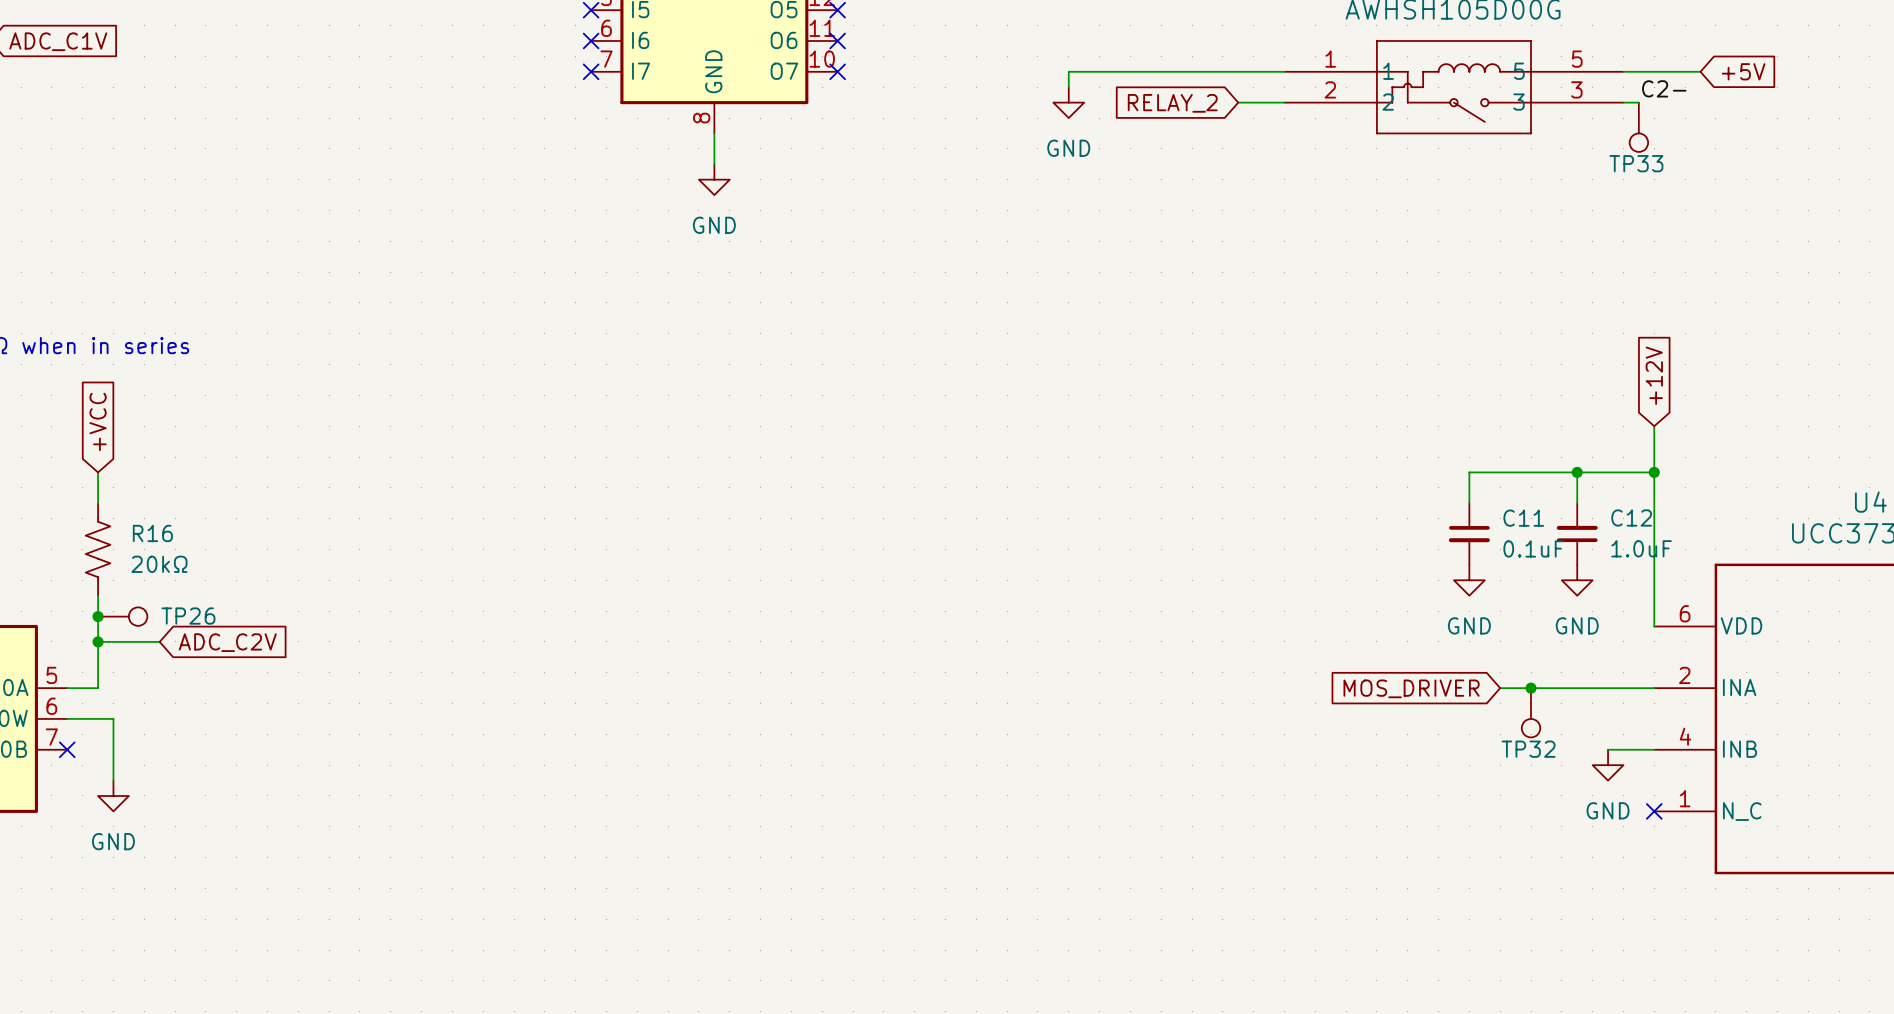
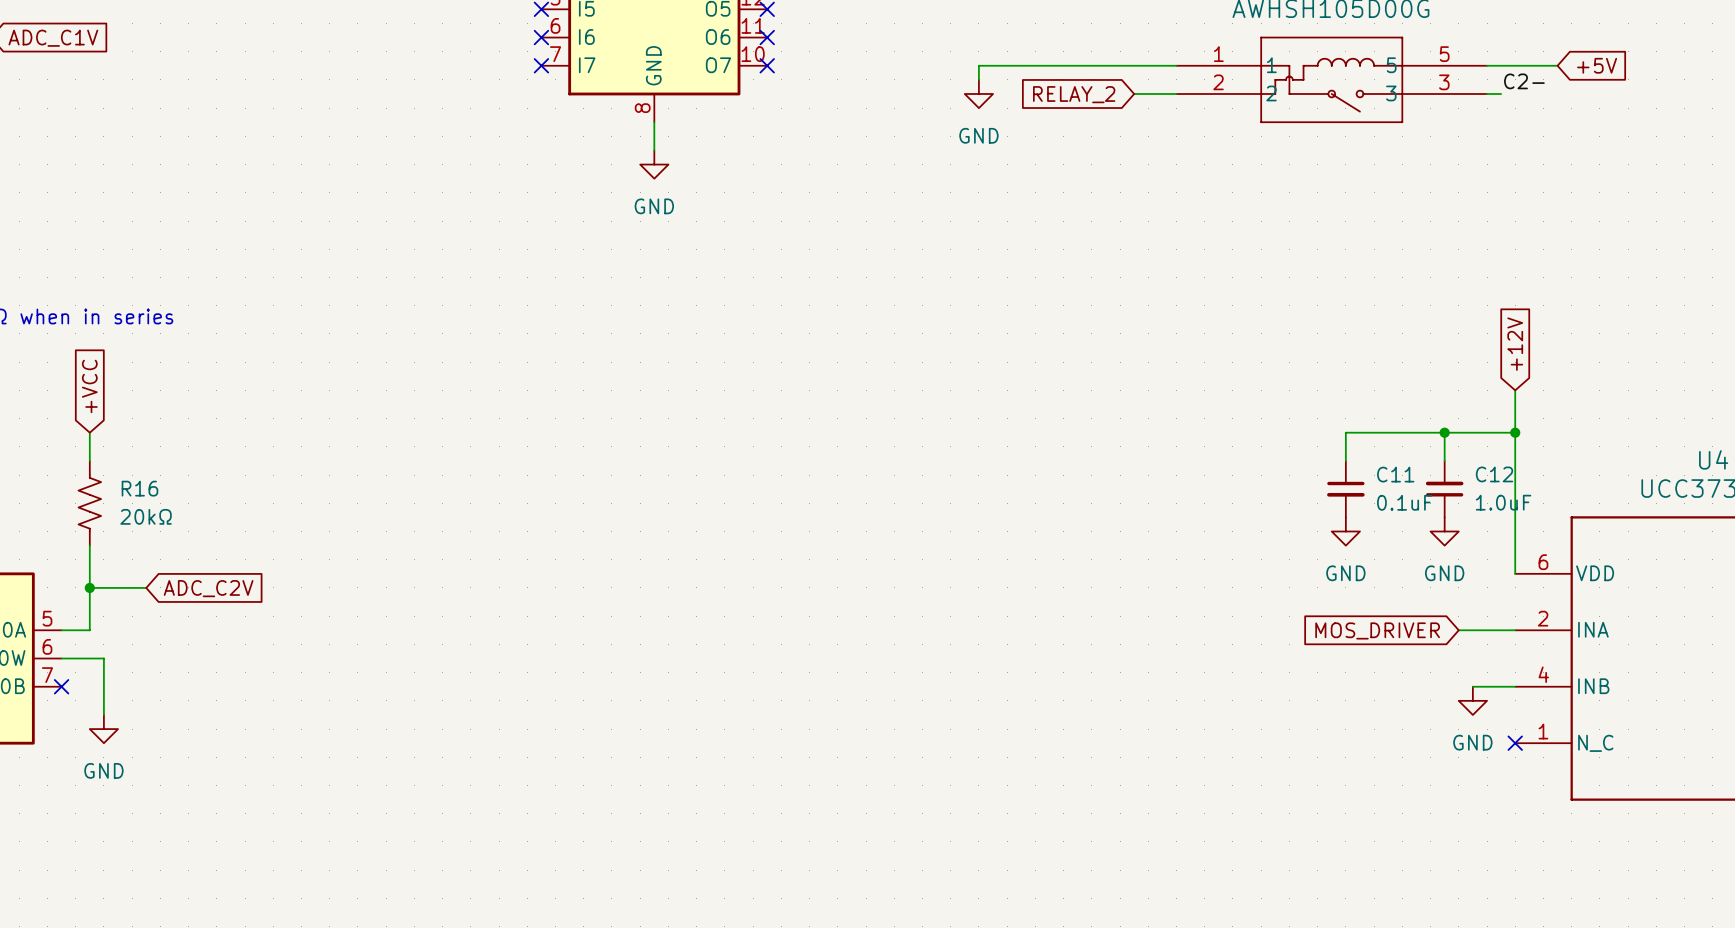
TP33: (1638, 127) -> none
junction: (98, 616) -> none
TP26: (122, 616) -> none
global label position: MOS_DRIVER (1411, 688) -> MOS_DRIVER (1377, 630)
wire: (1500, 688) (1592, 688) -> none
junction: (1531, 688) -> none
TP32: (1531, 712) -> none

